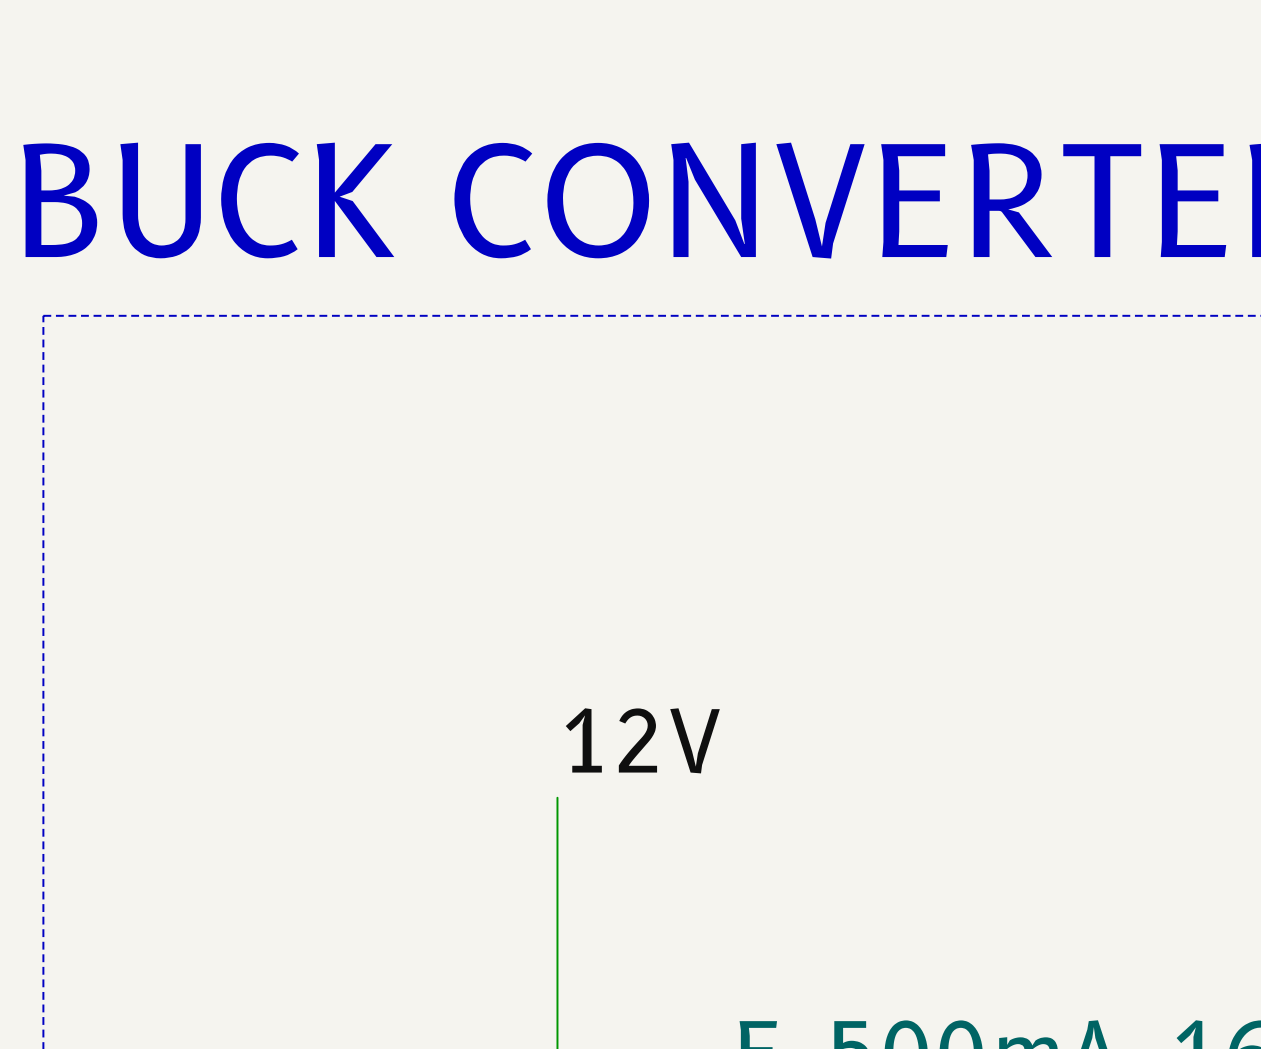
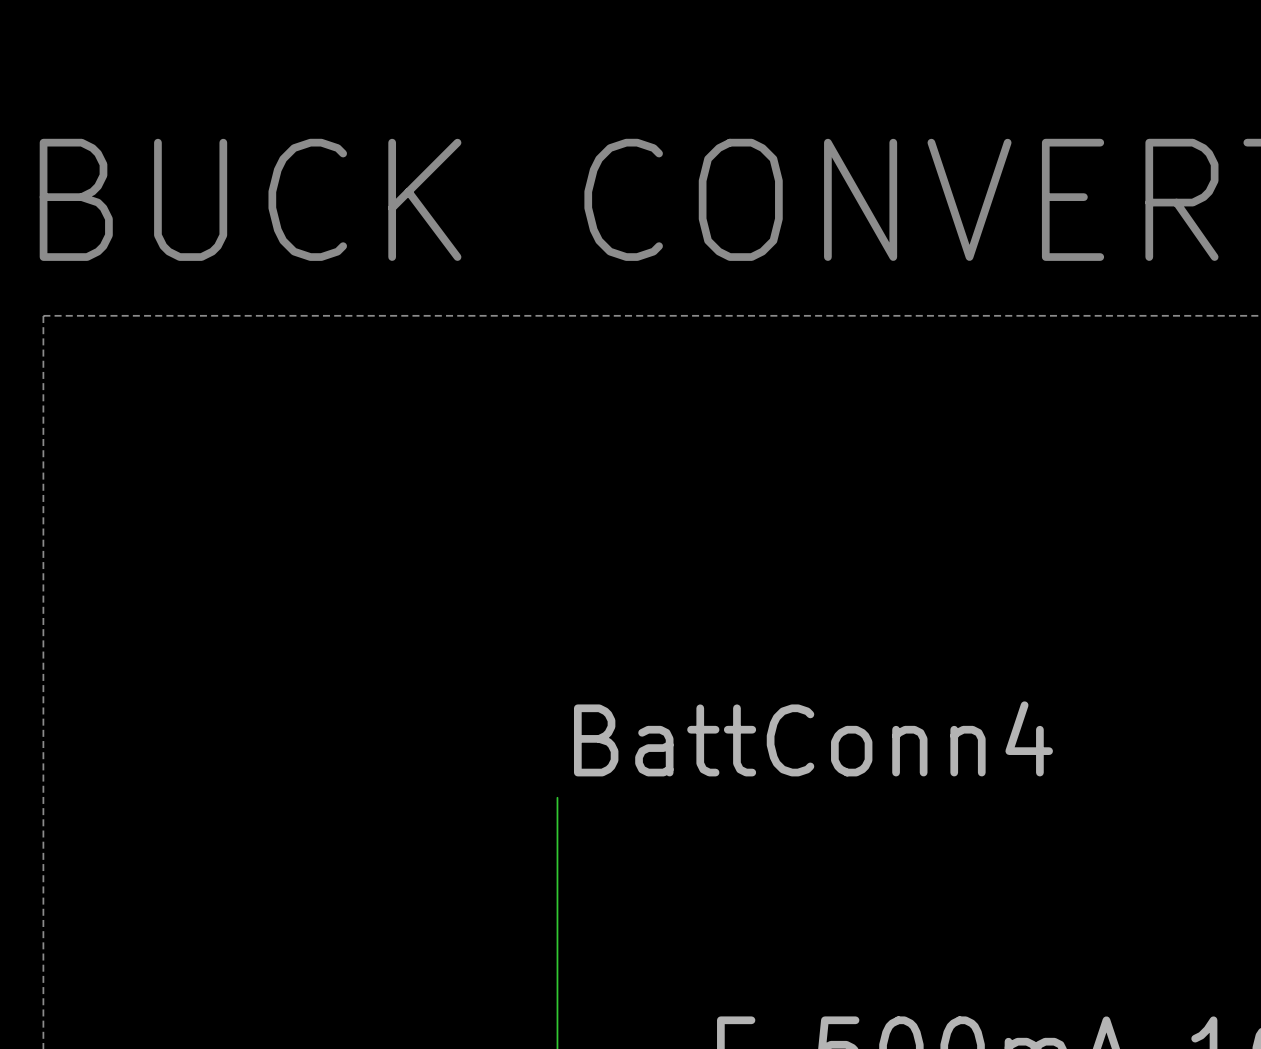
label: 12V (642, 740) -> BattConn4 (813, 738)

